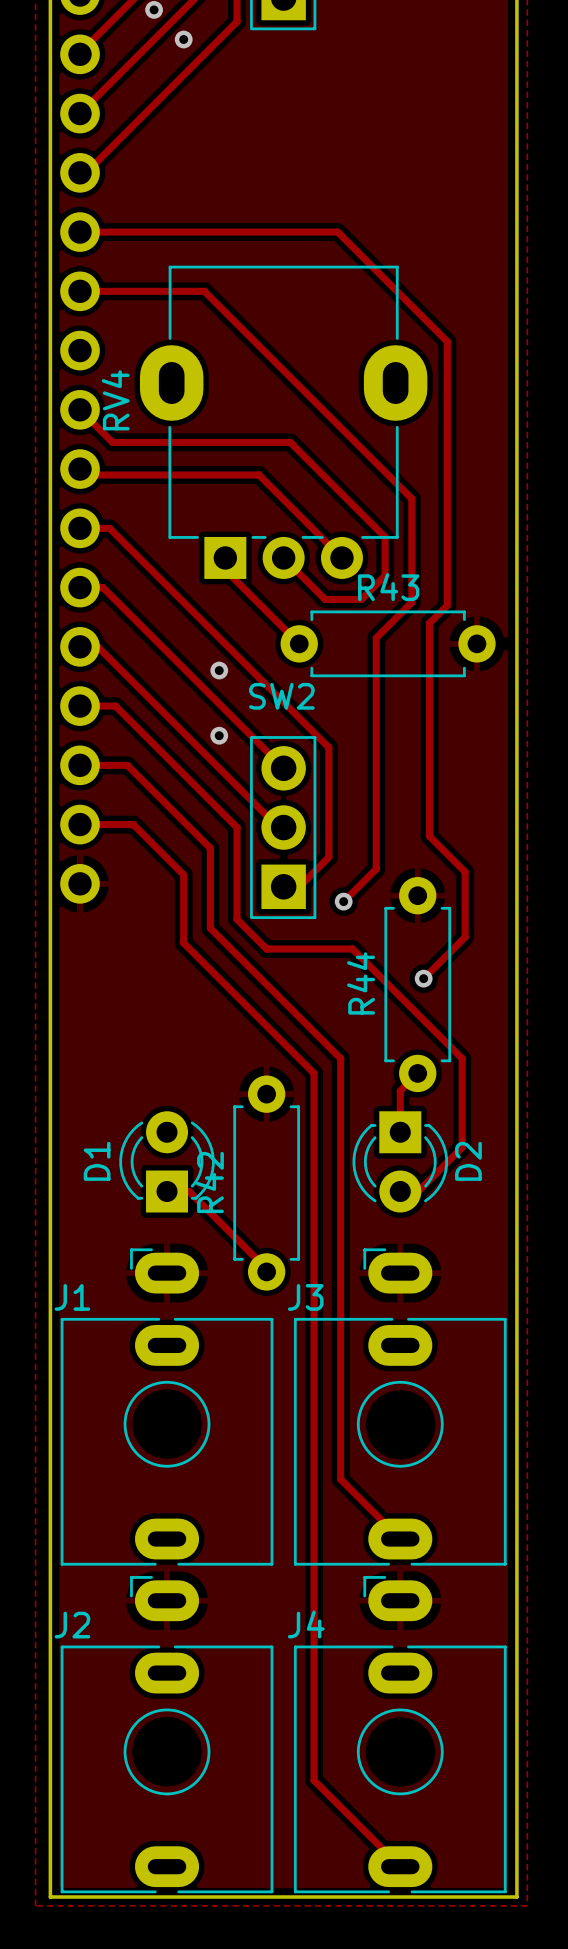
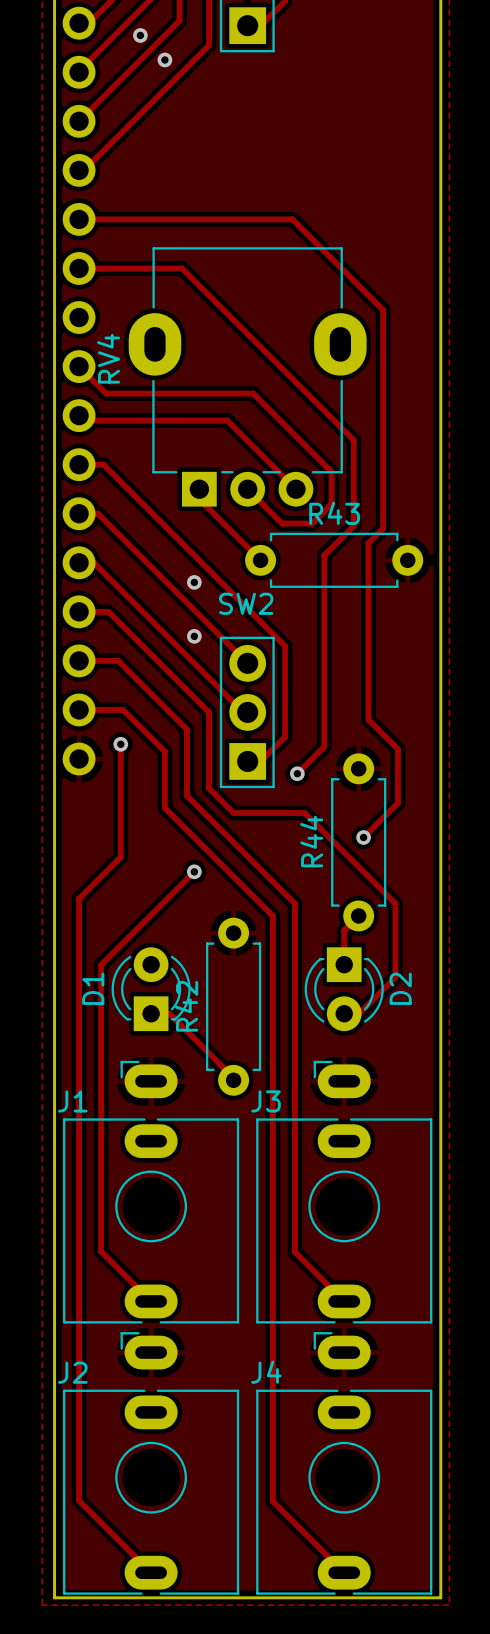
track: none -> (120, 744) (120, 857) (79, 898) (79, 1500) (151, 1572)
via: none -> (120, 744)
track: none -> (194, 871) (101, 965) (101, 1251) (151, 1301)
via: none -> (194, 871)

